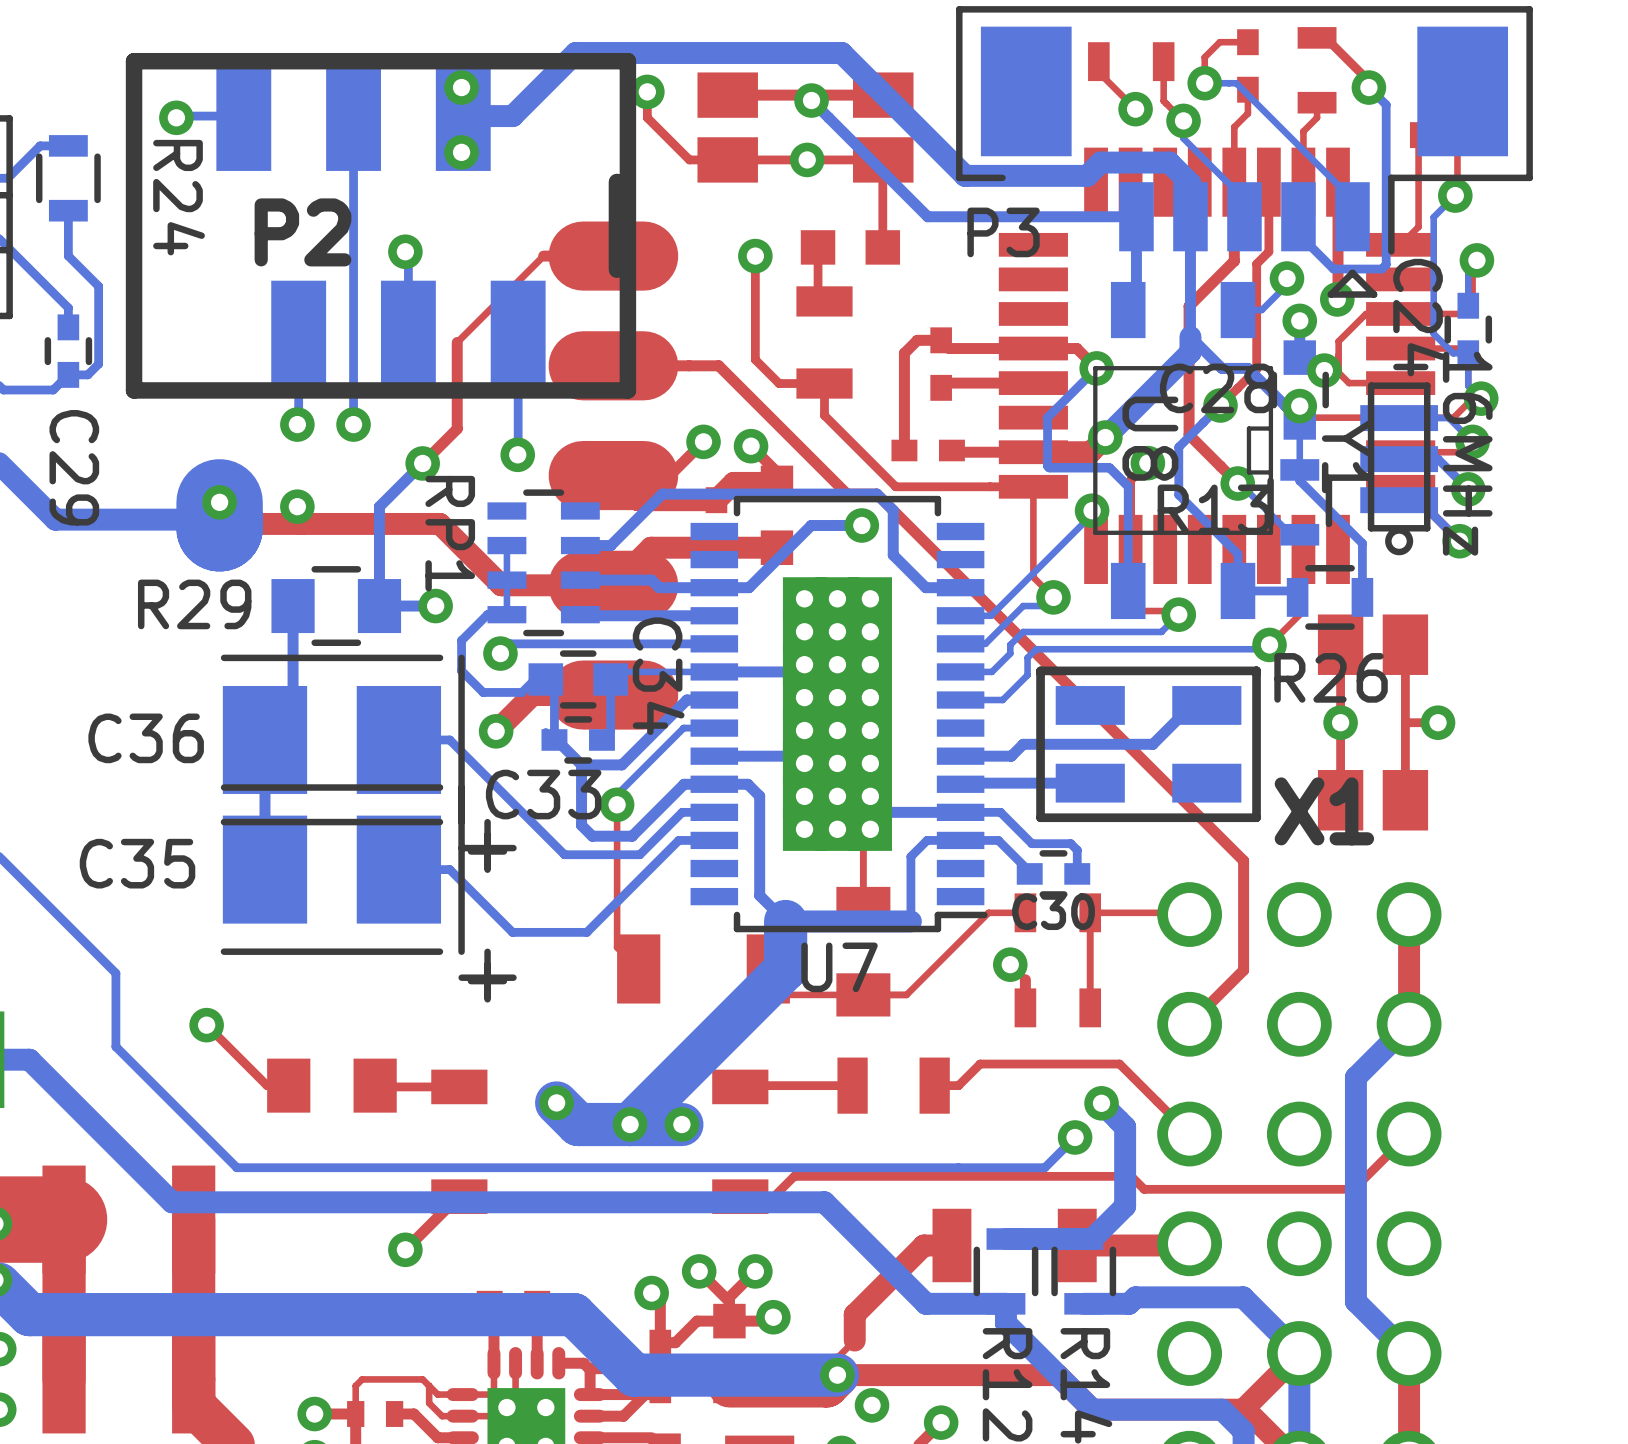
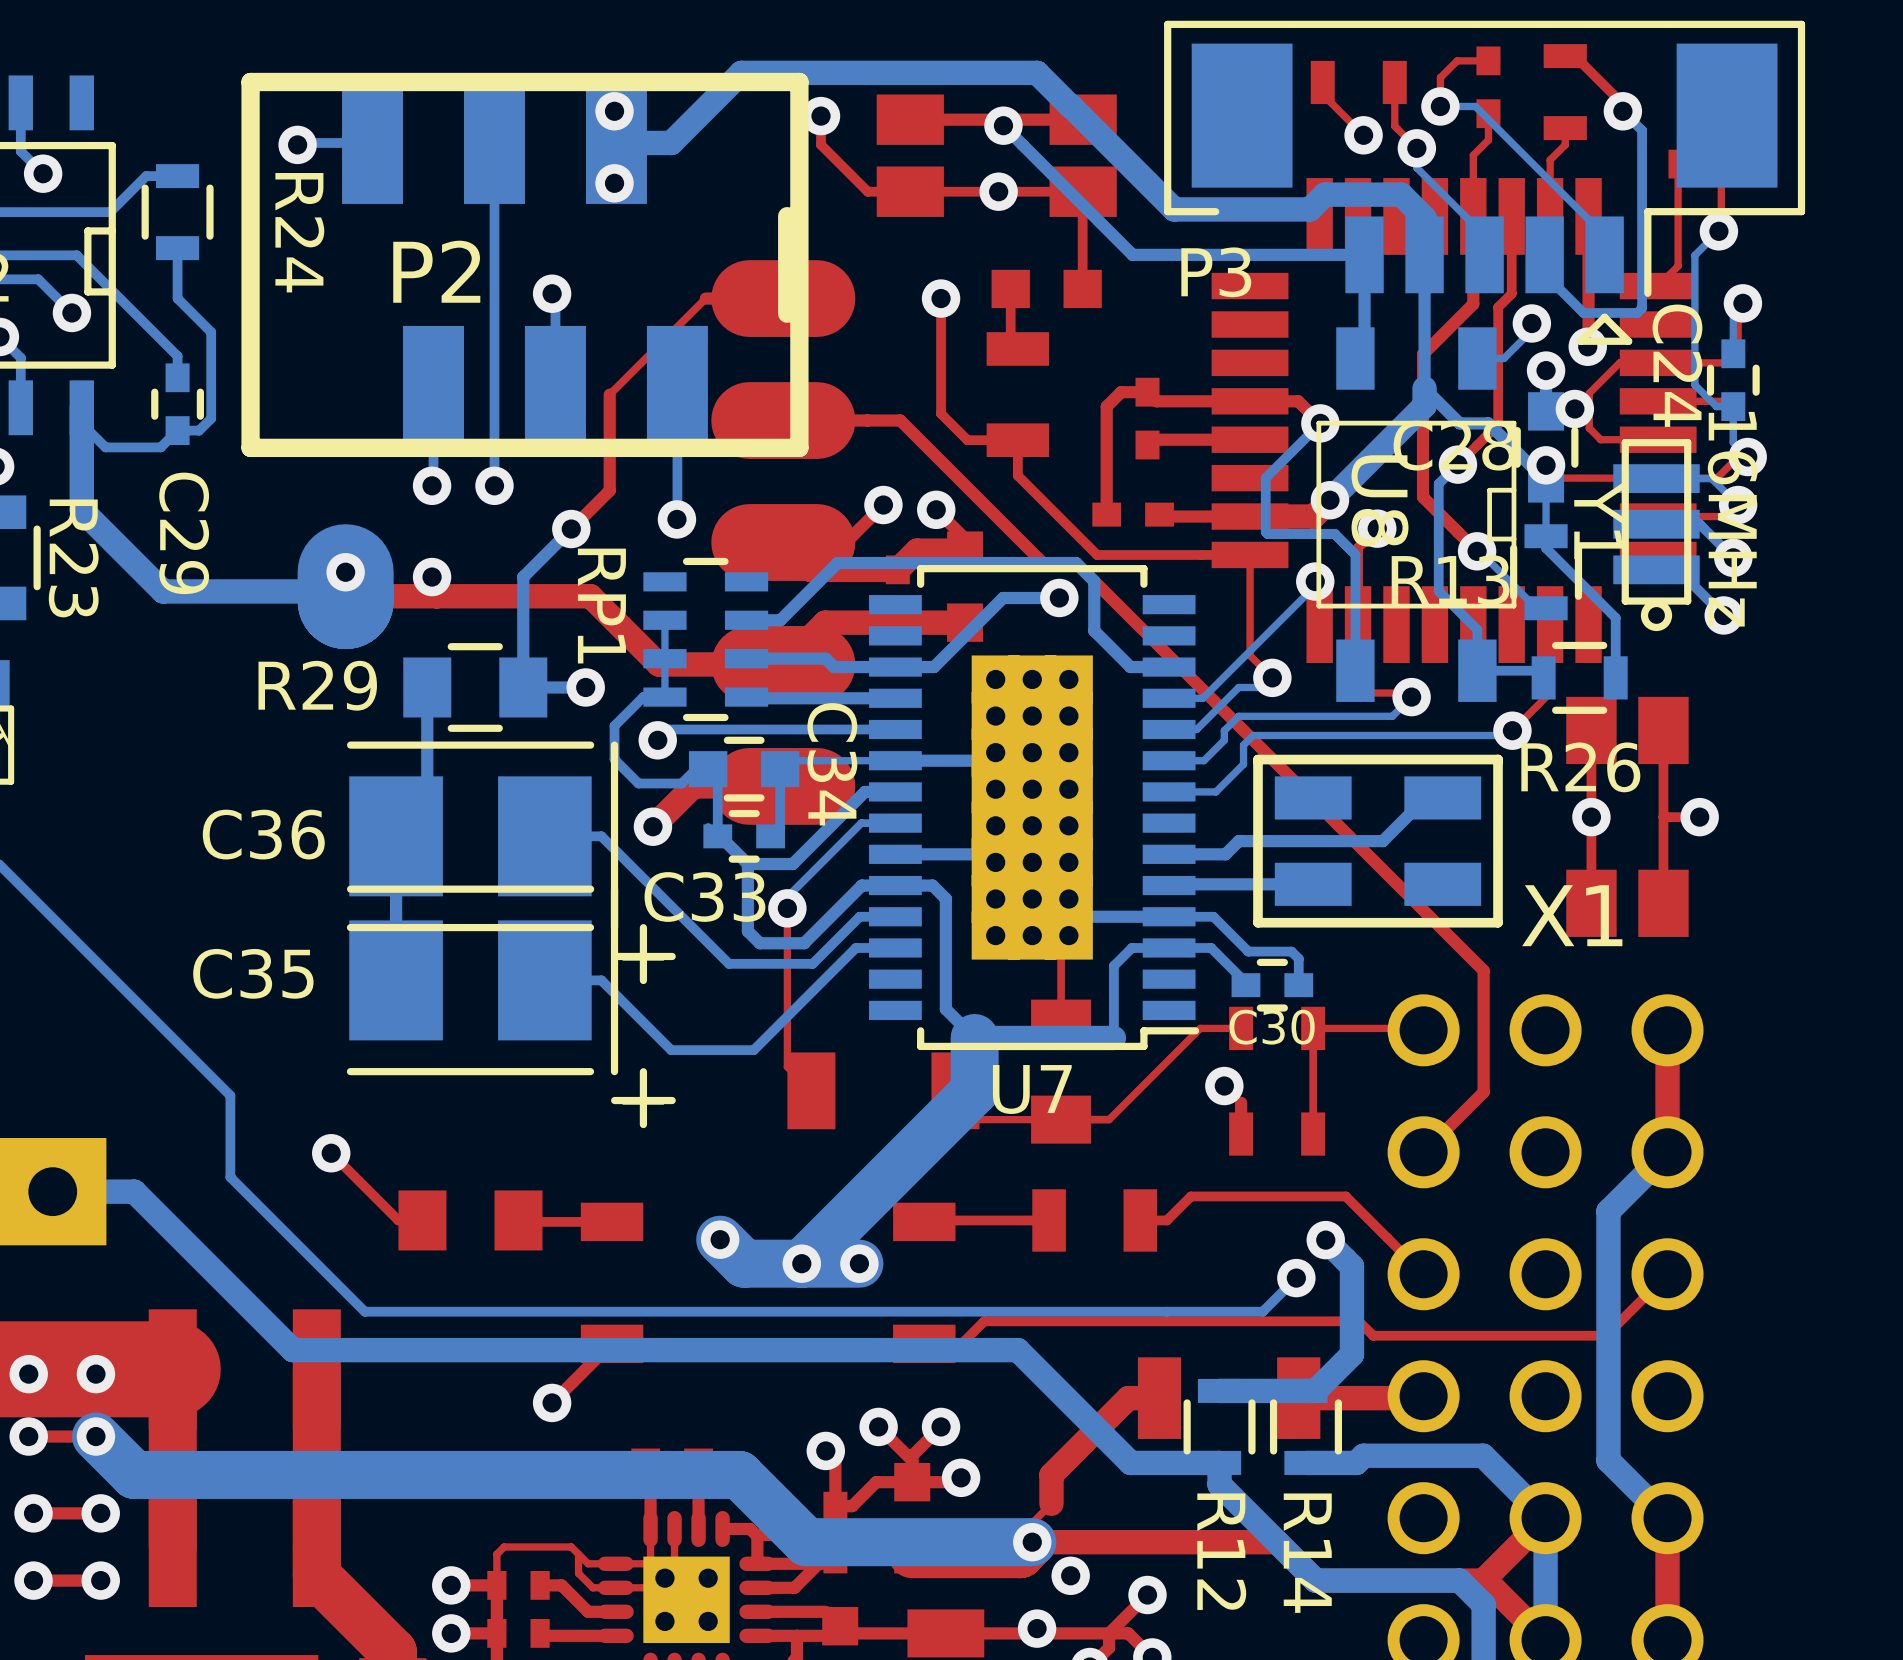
via position: (1324, 370) -> (1574, 408)
bottom track: (1203, 422) (1178, 447) (1178, 494) (1203, 519) -> (1438, 483) (1438, 591)

